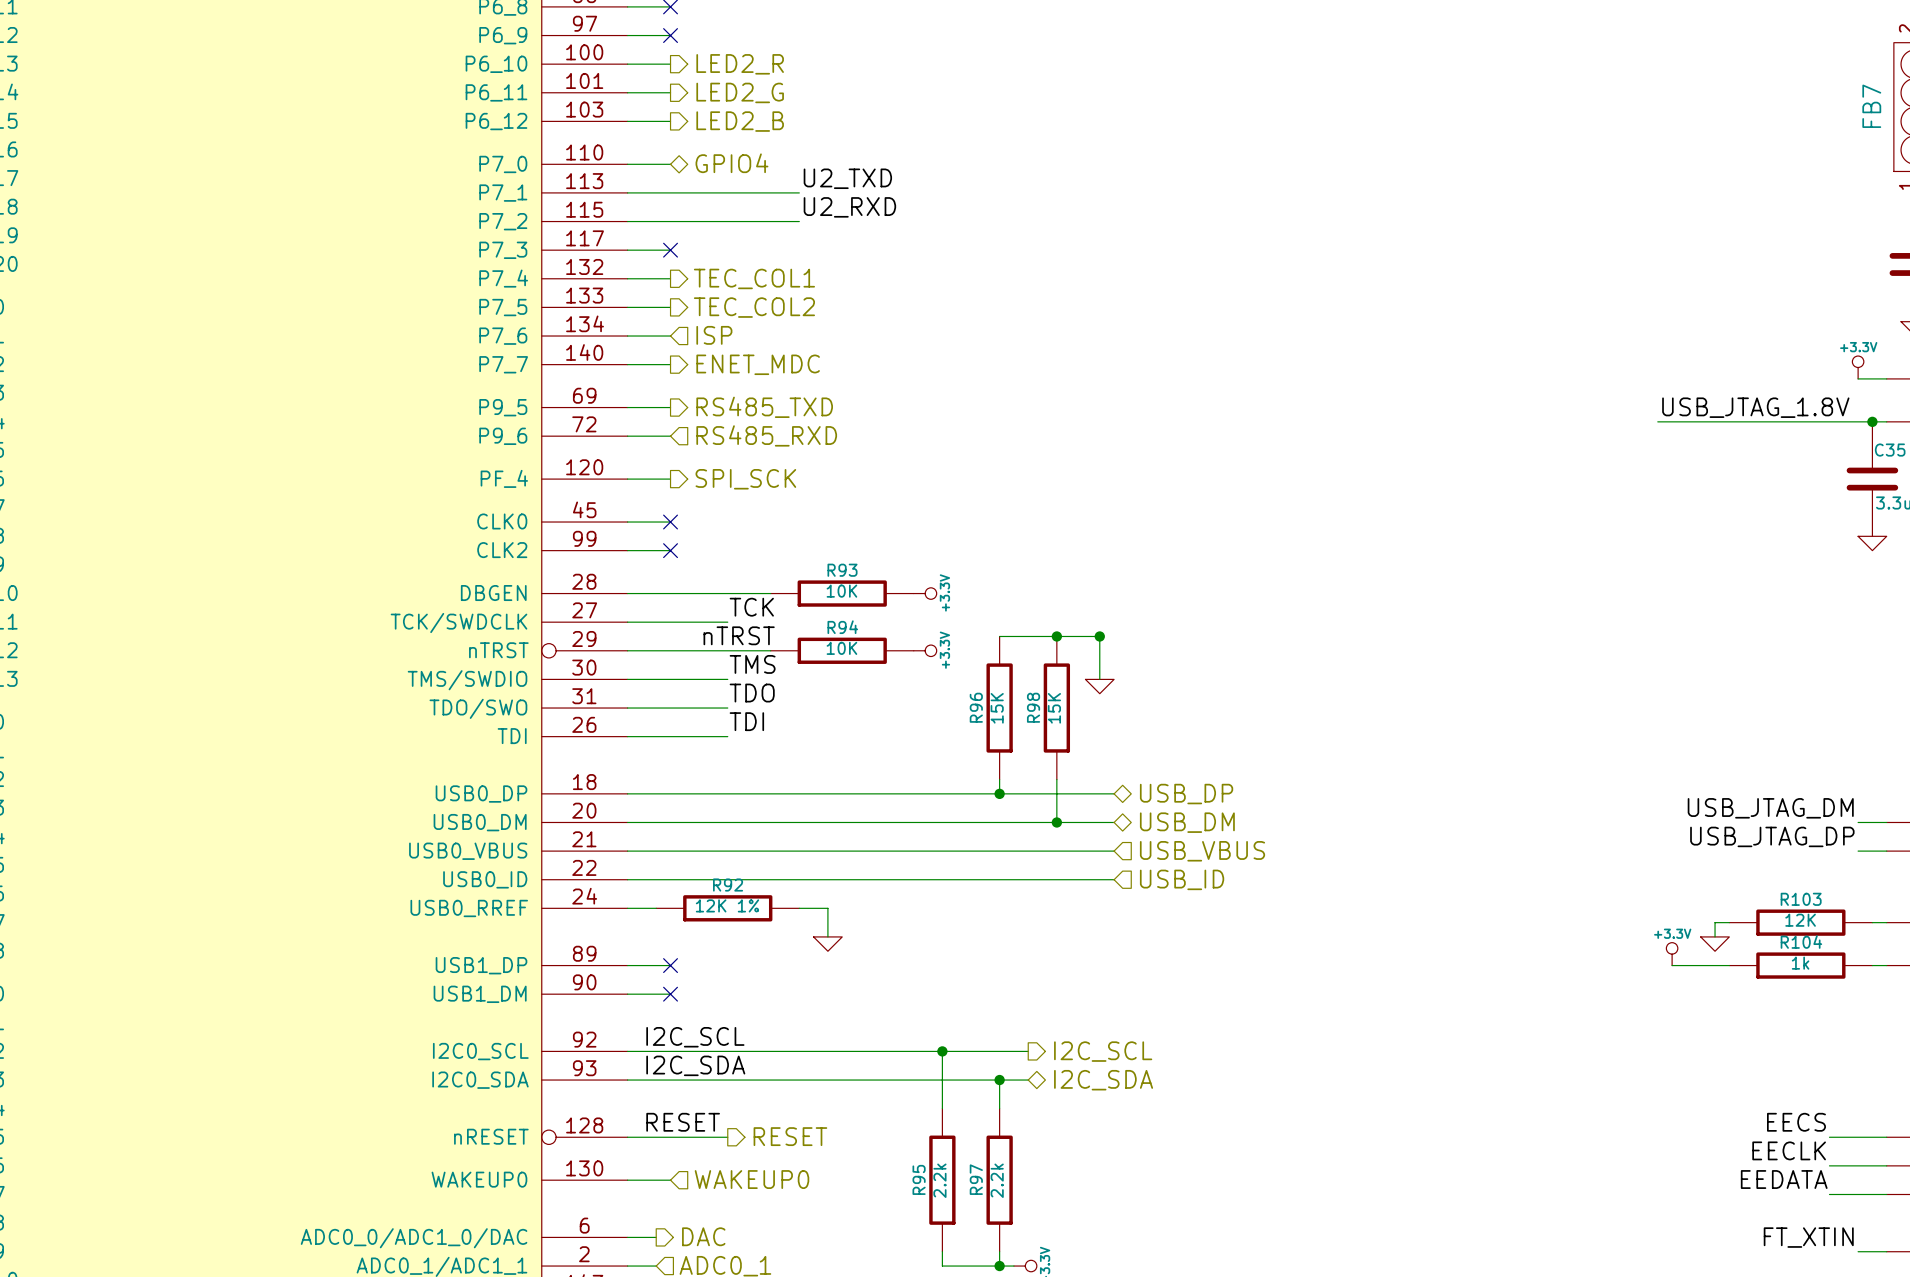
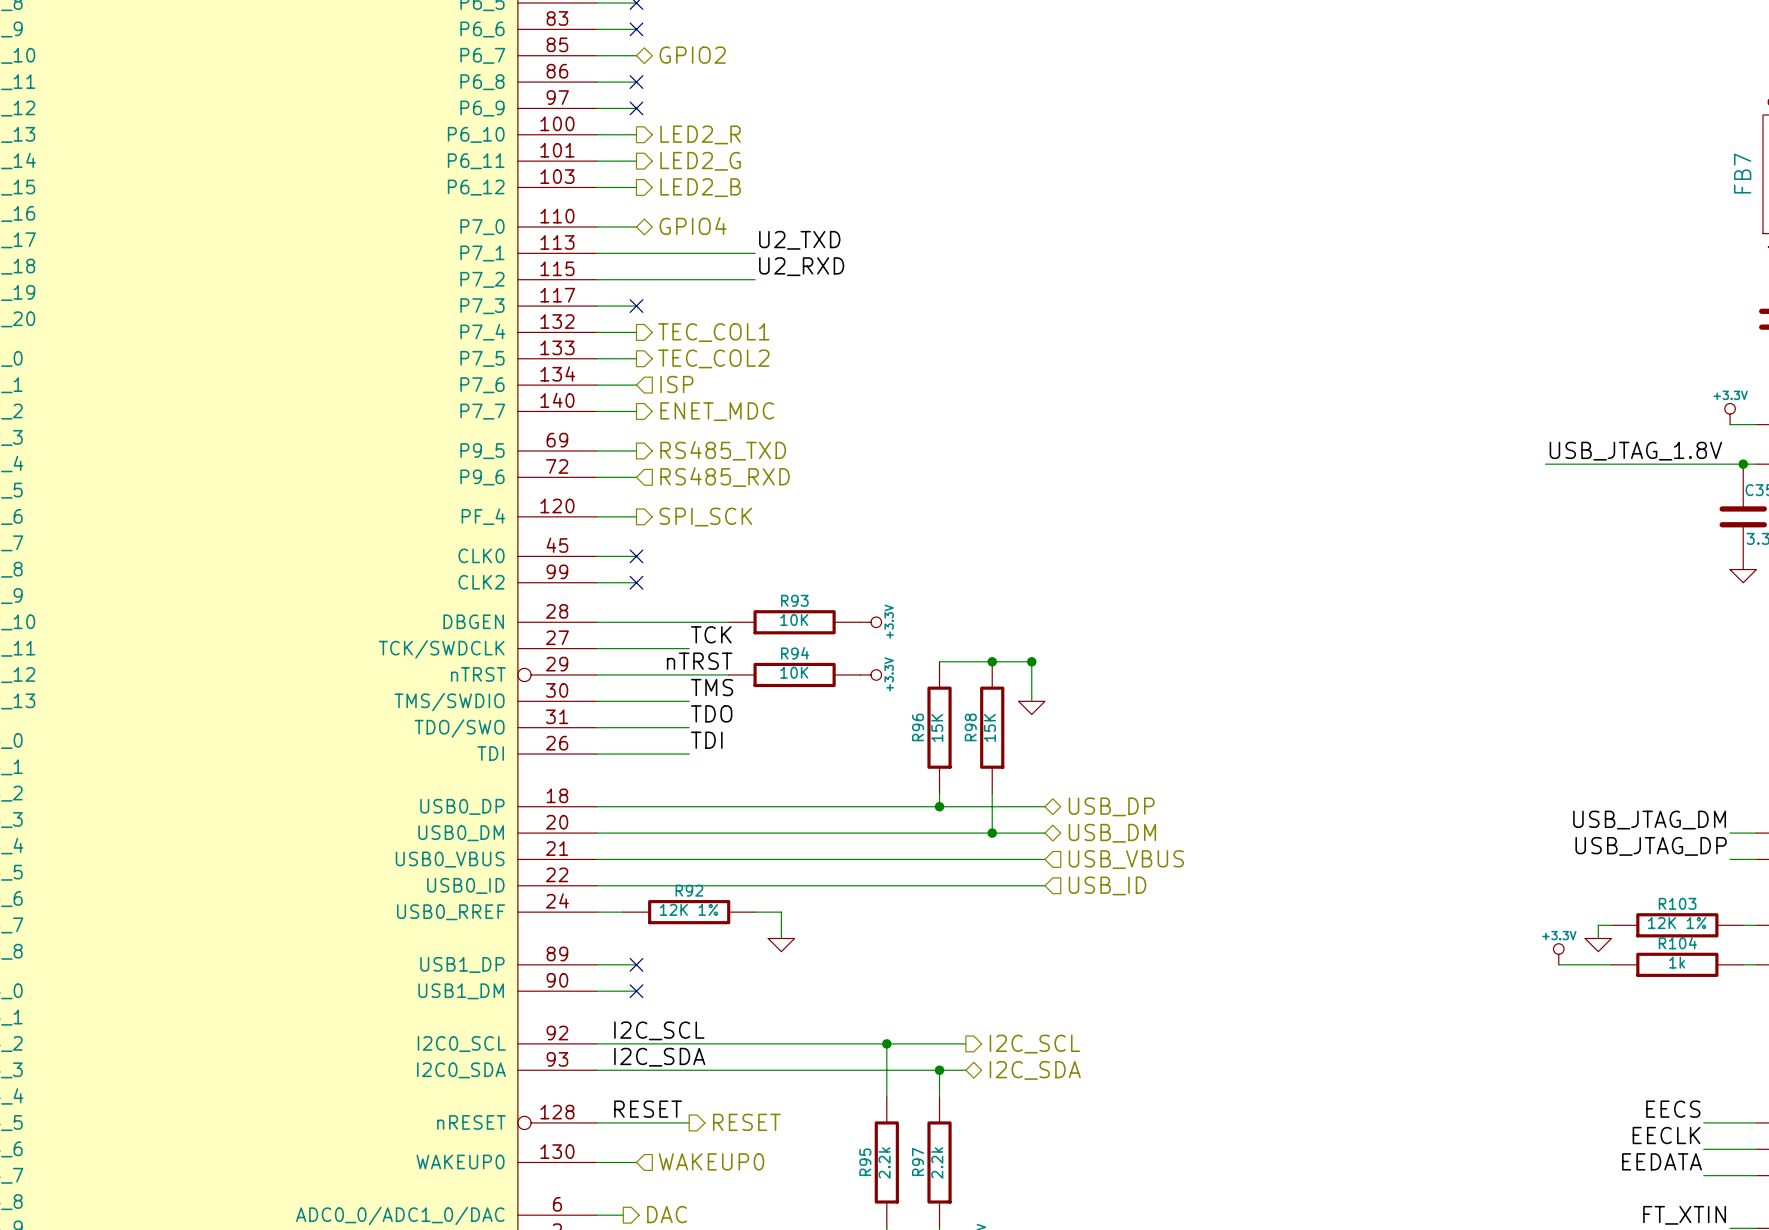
R103 value: 12K (1800, 920) -> 12K 1% (1677, 923)

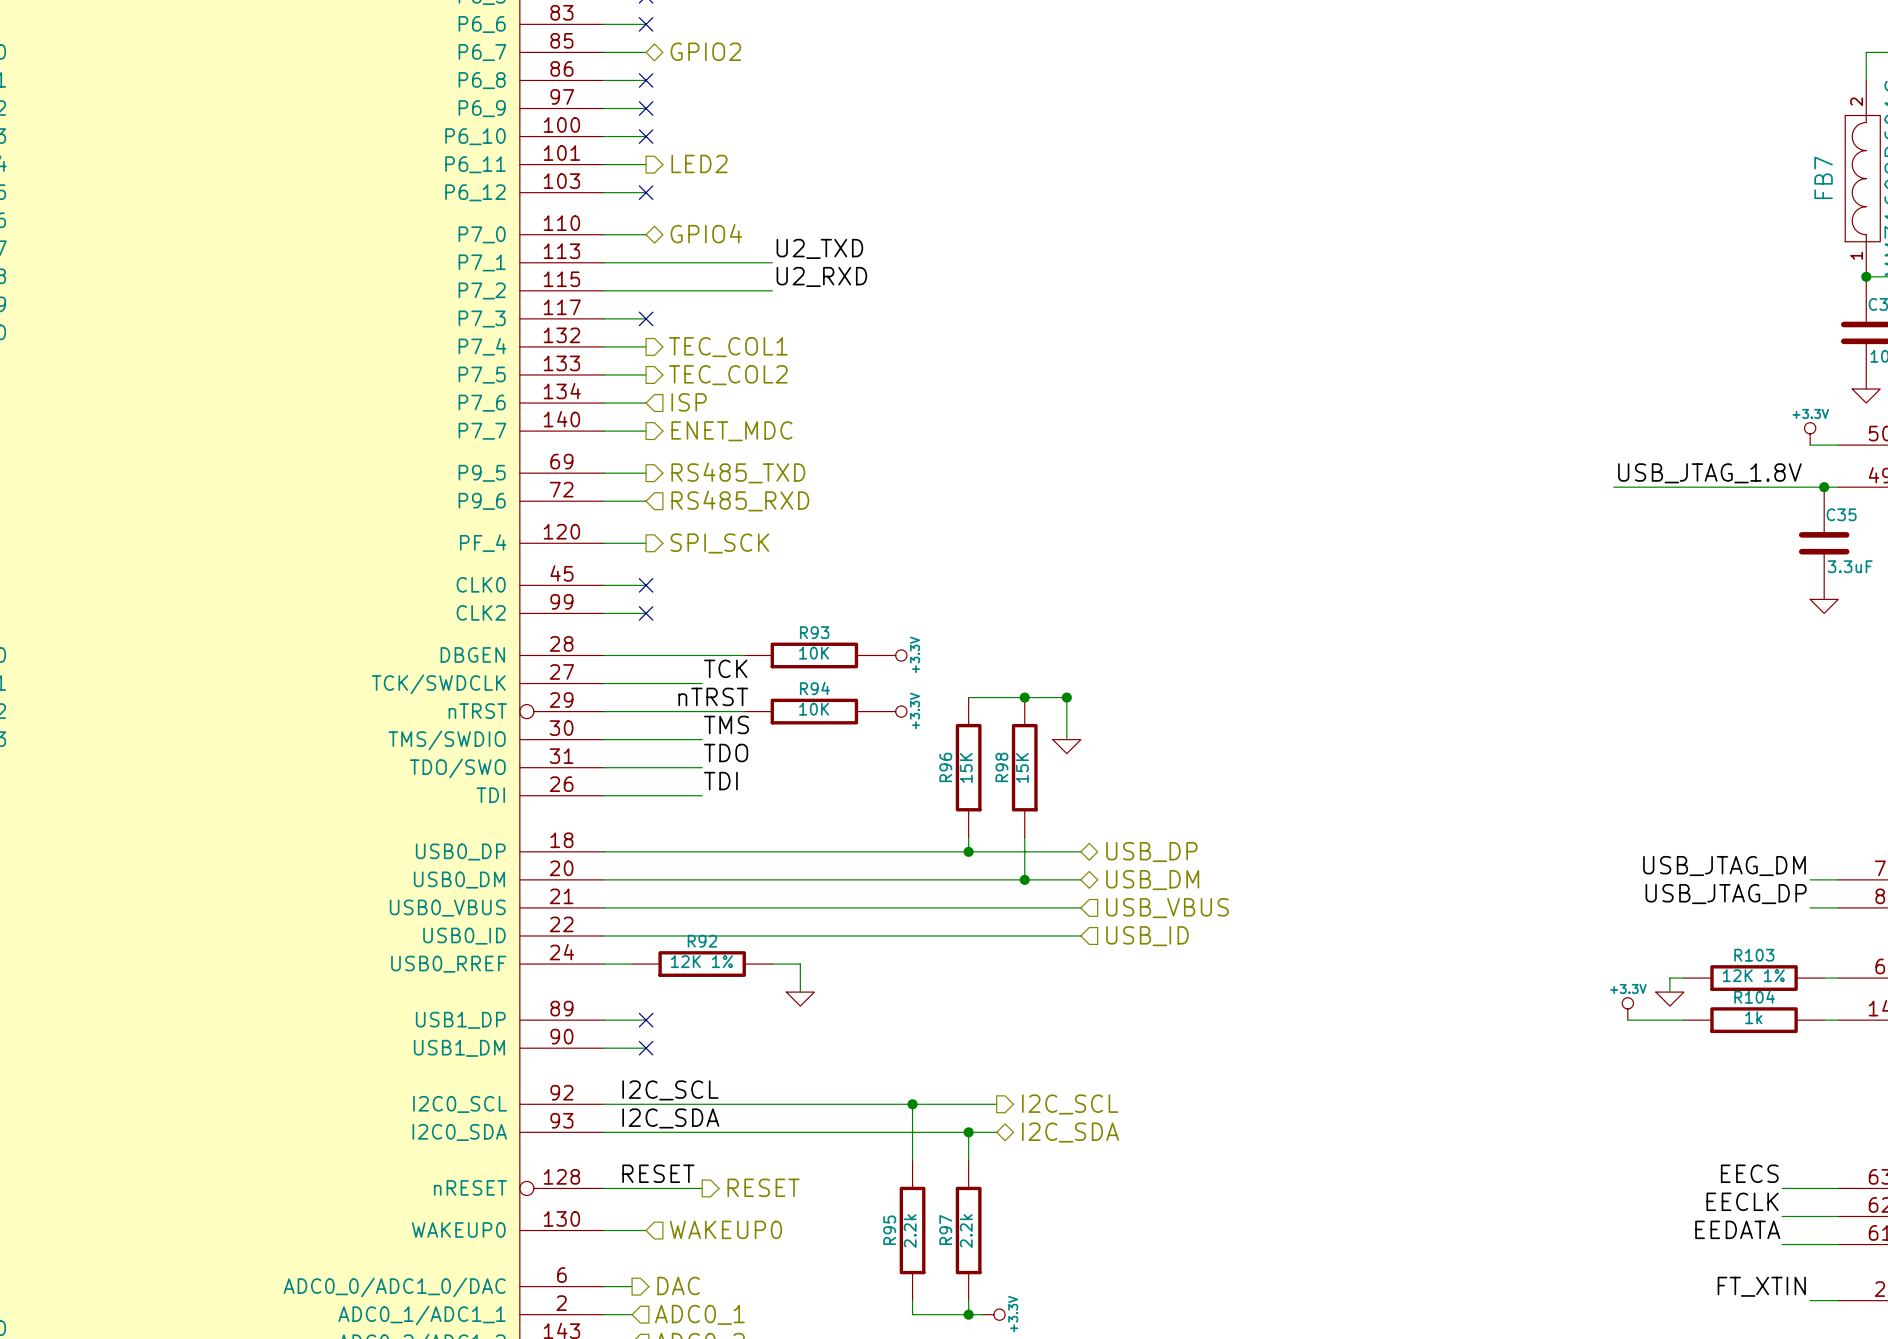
no-connect mark: none -> (646, 136)
hierarchical label: LED2_R (700, 134) -> none
hierarchical label: LED2_G (700, 161) -> LED2 (699, 163)
no-connect mark: none -> (646, 192)
hierarchical label: LED2_B (700, 187) -> none

